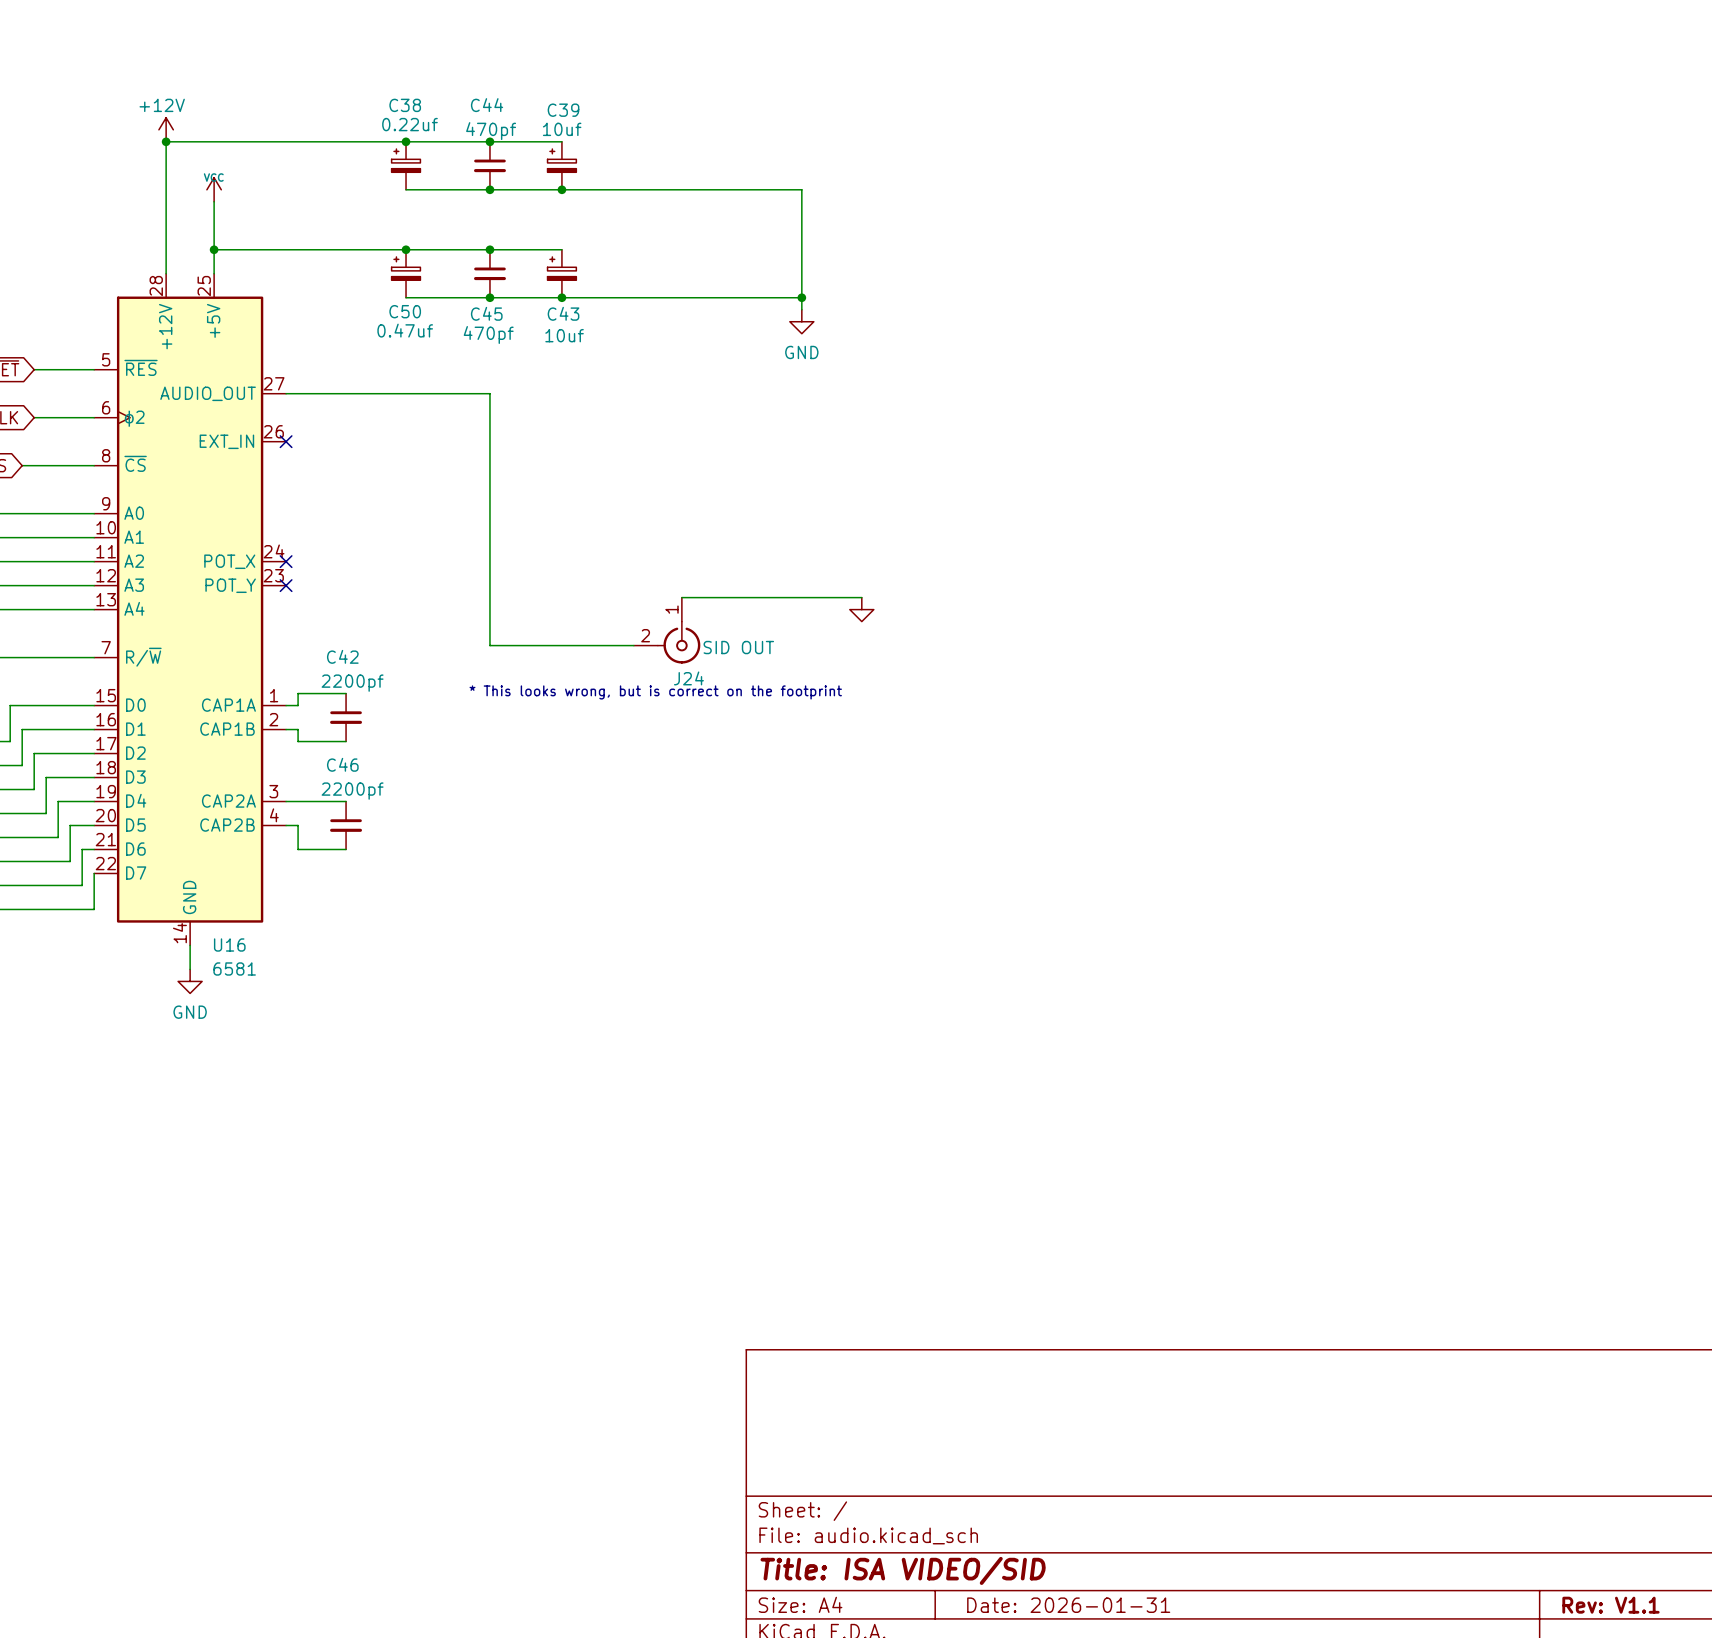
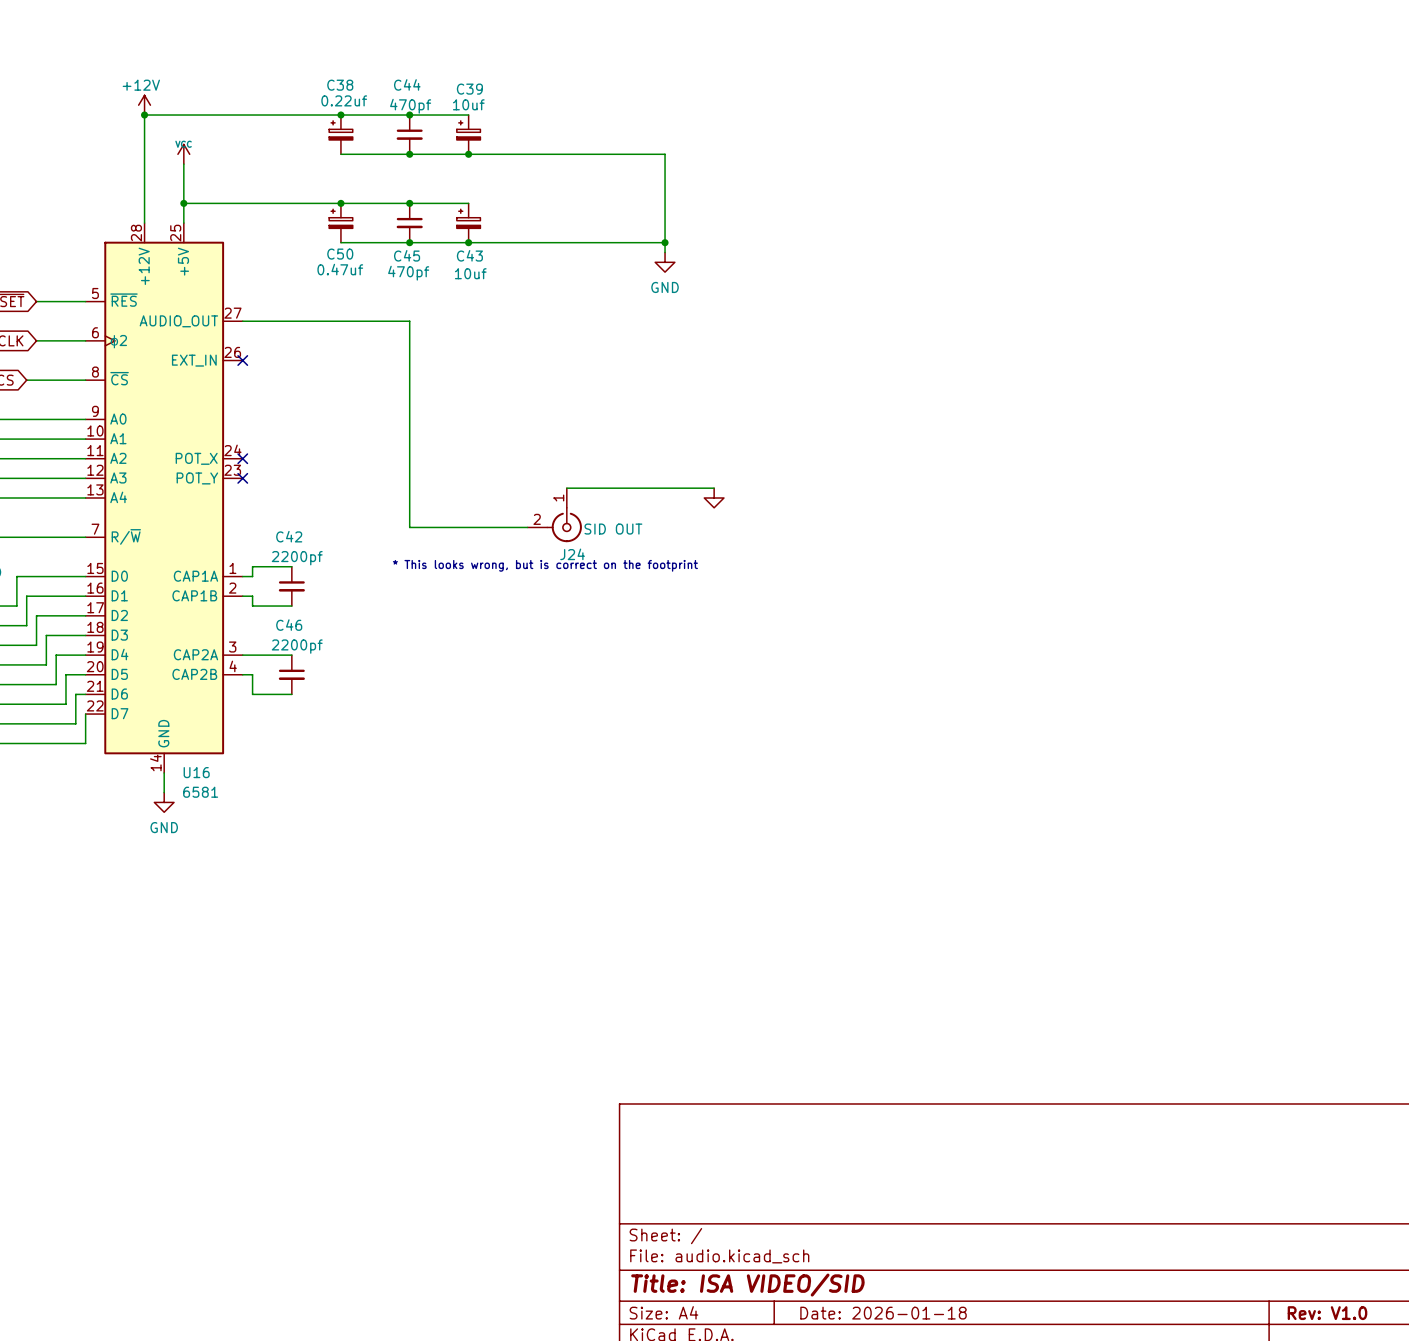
title block: Date: 2026-01-31 (1068, 1605) -> Date: 2026-01-18 (883, 1313)
title block: Rev: V1.1 (1610, 1605) -> Rev: V1.0 (1327, 1313)

